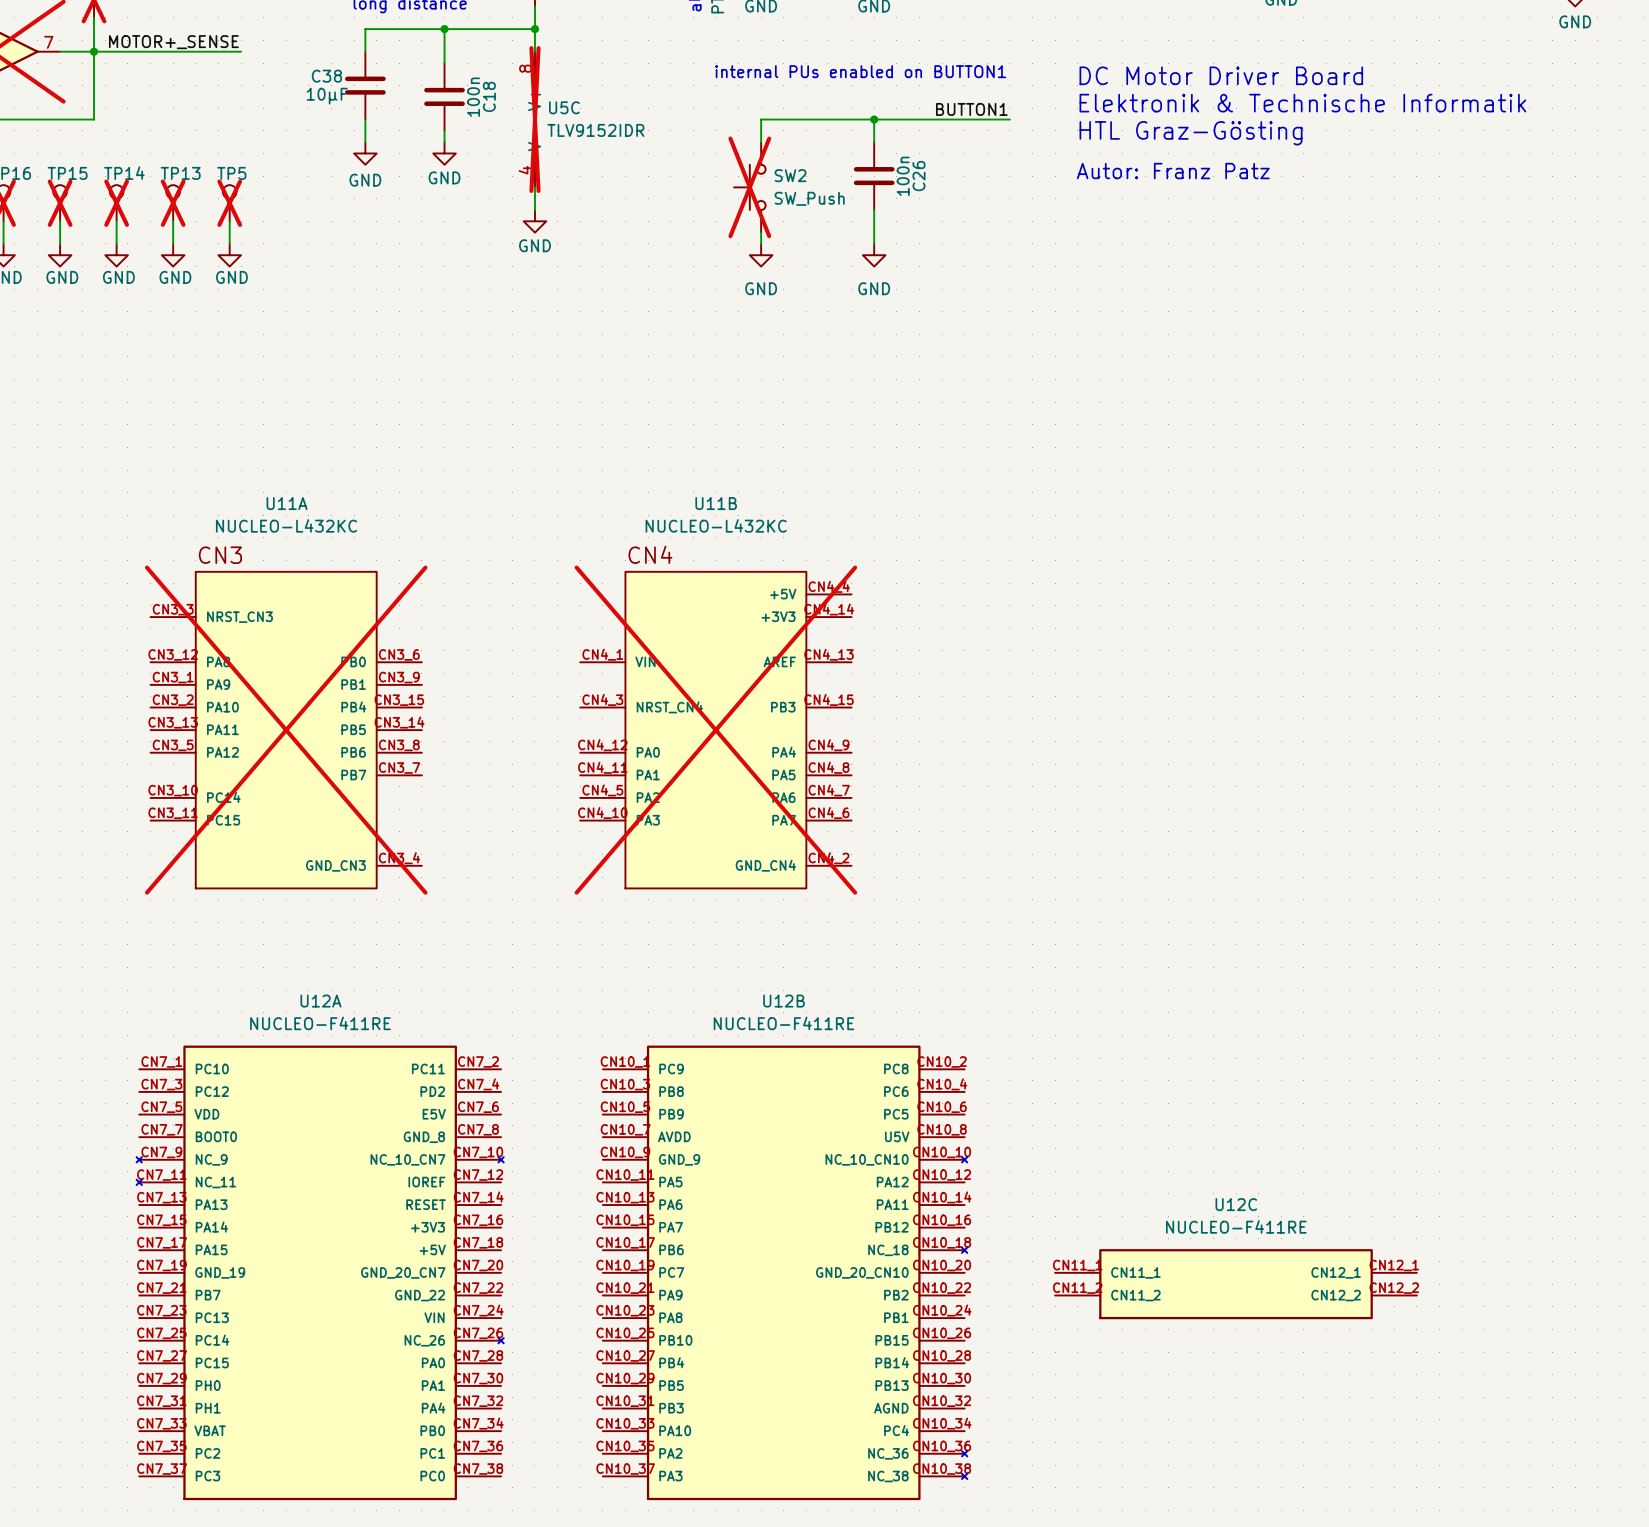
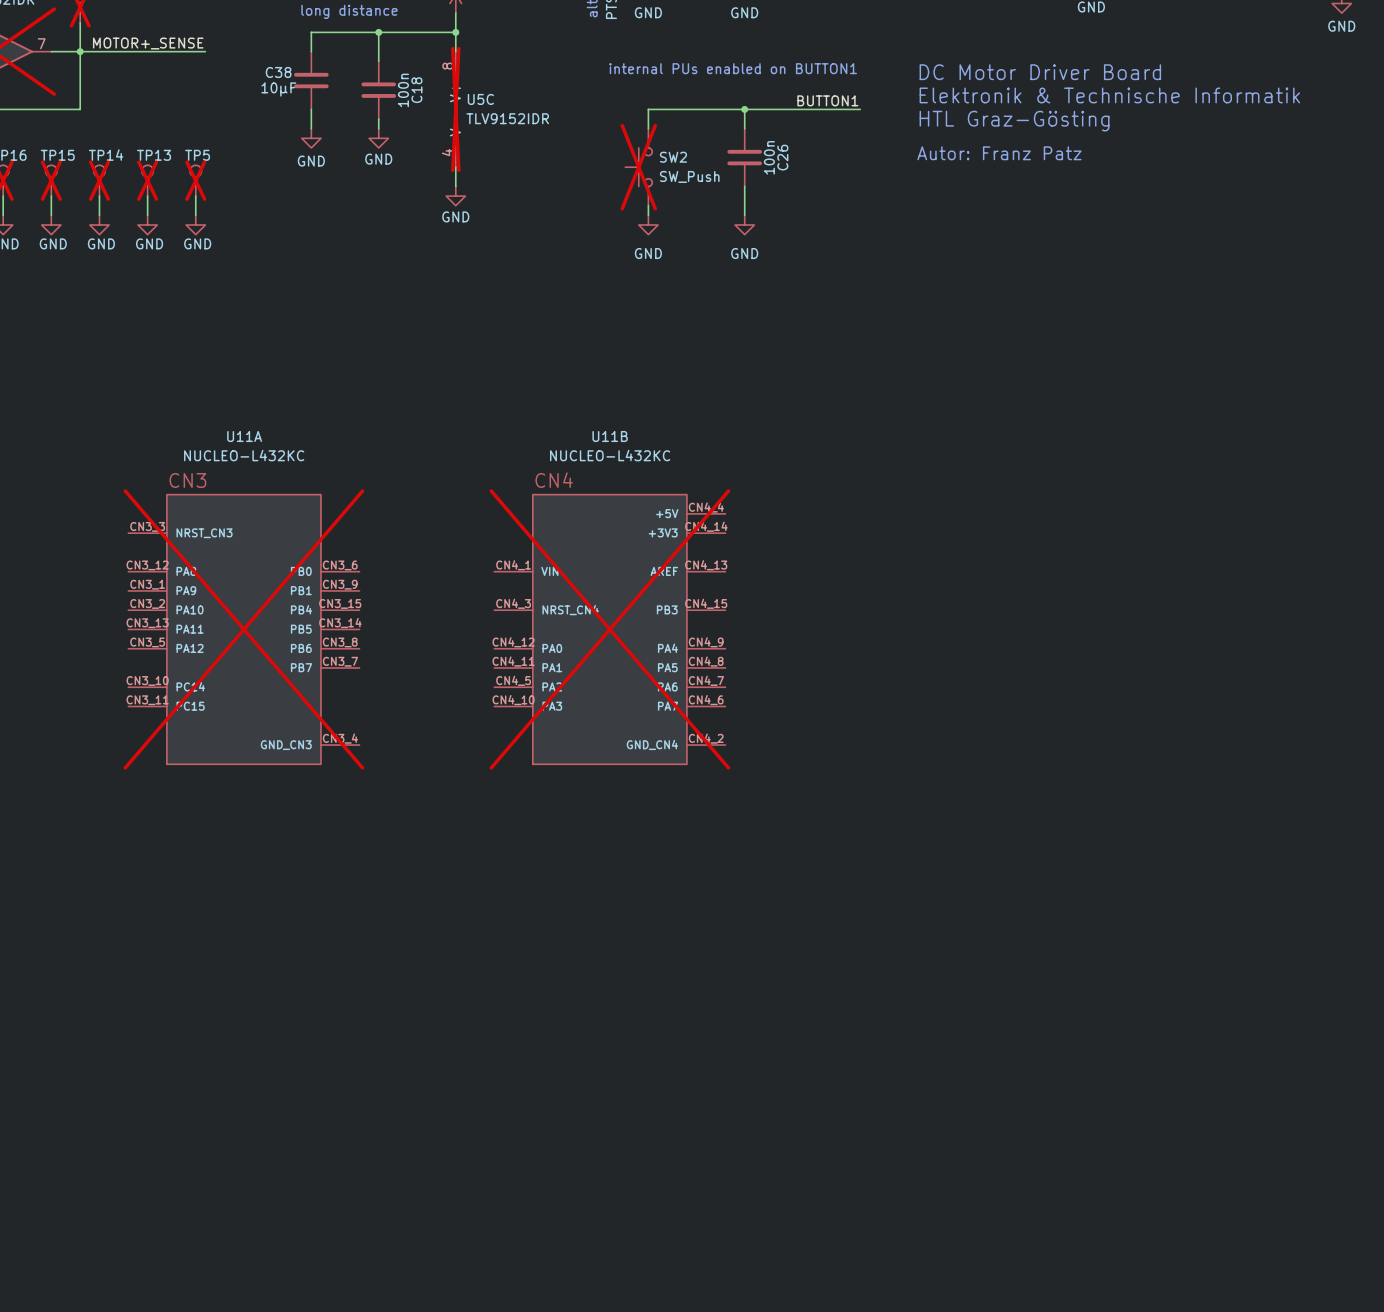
U12A: NUCLEO-F411RE (320, 1272) -> none
U12B: NUCLEO-F411RE (785, 1272) -> none
U12C: NUCLEO-F411RE (1236, 1284) -> none

